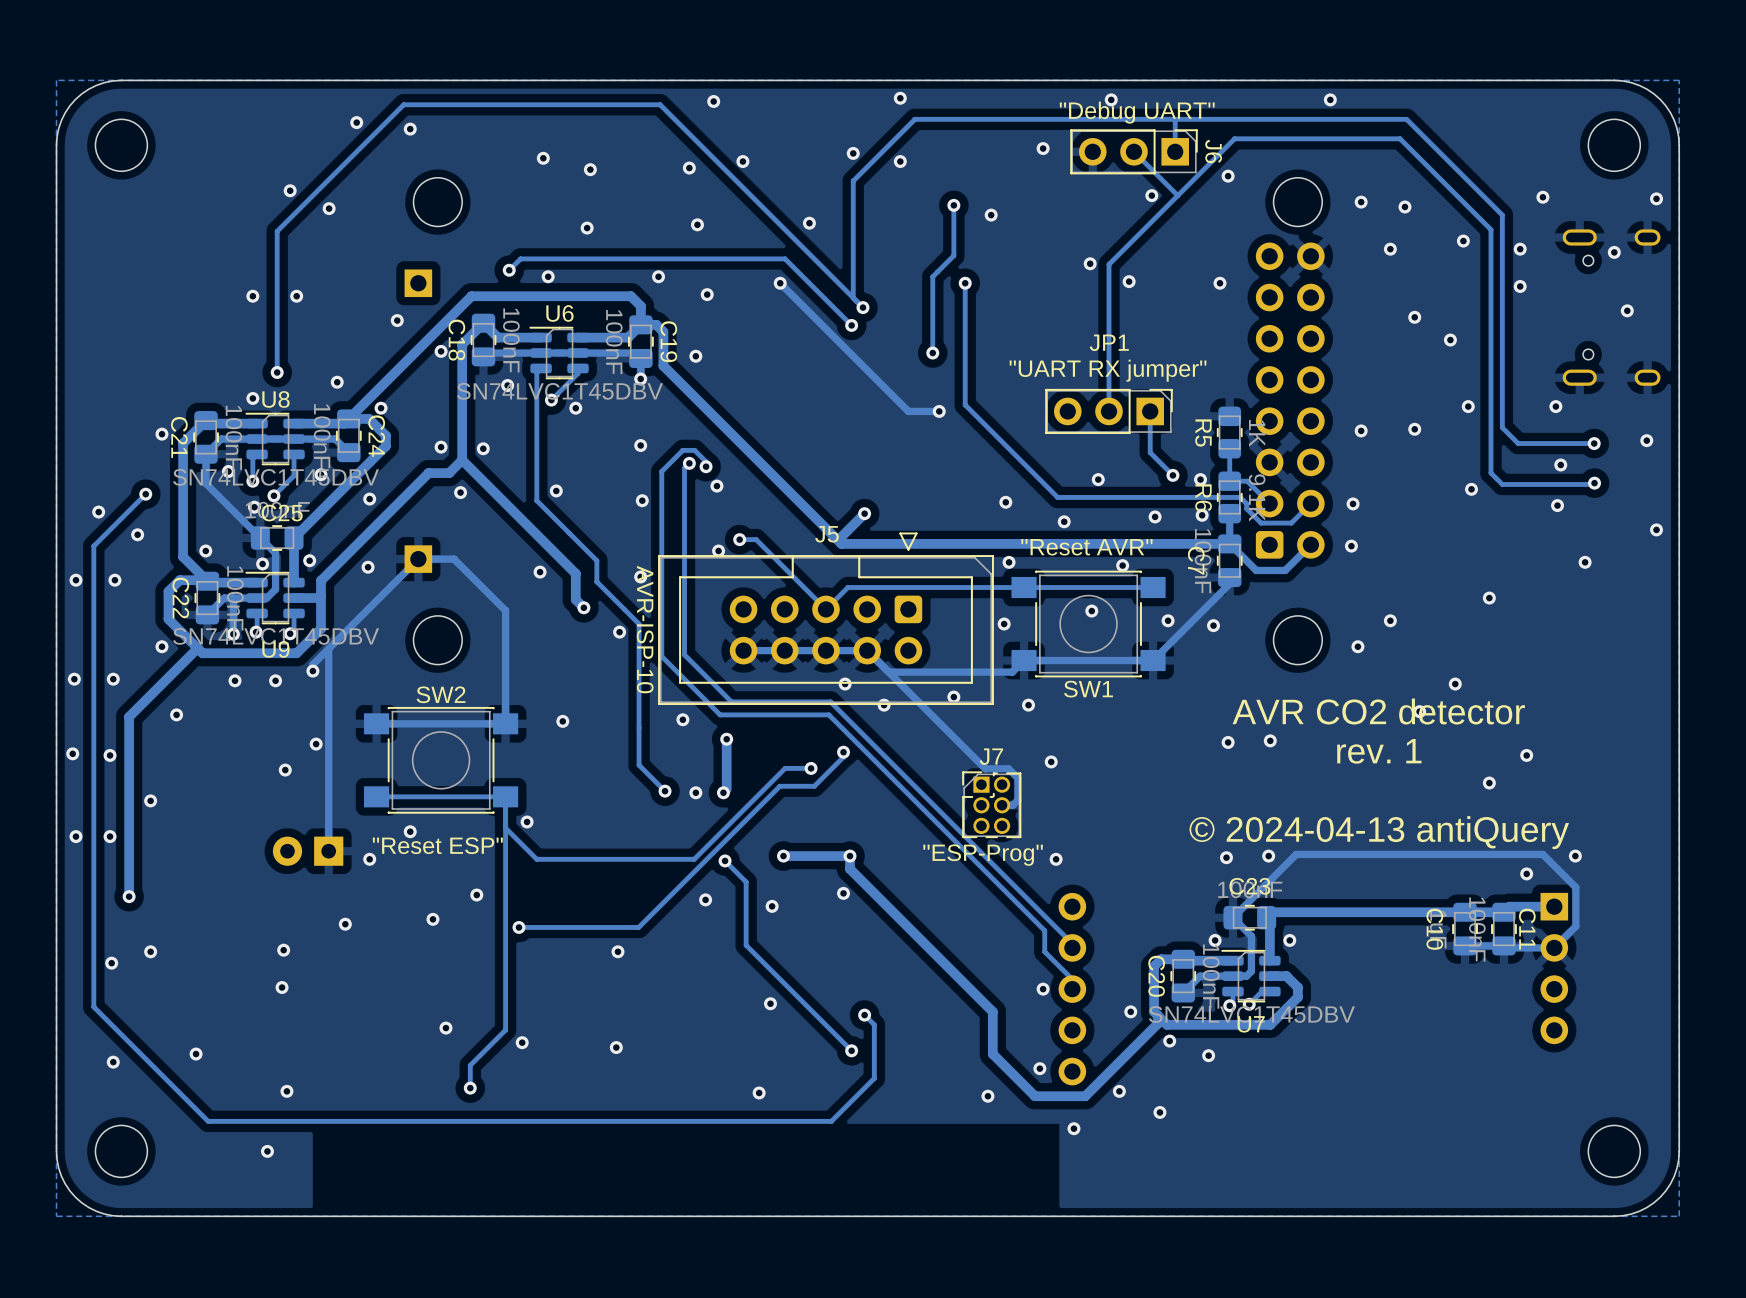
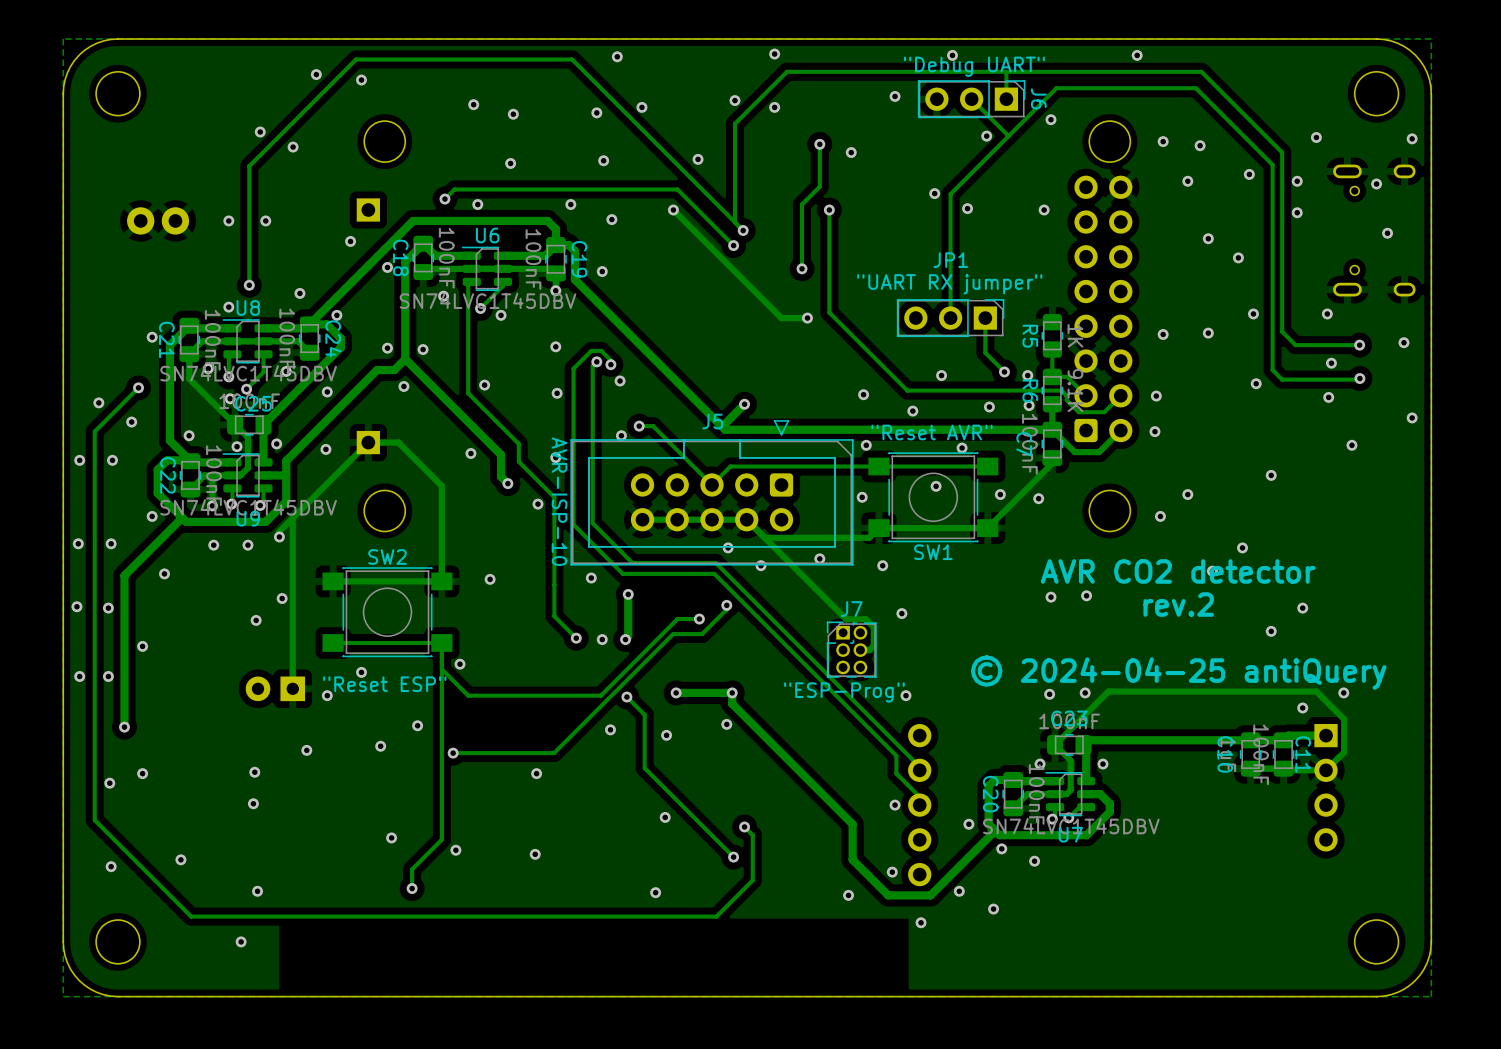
part: none -> (158, 220)
text: rev. 1 (1379, 751) -> rev.2 (1178, 604)
text: © 2024-04-13 antiQuery (1379, 832) -> © 2024-04-25 antiQuery (1178, 672)

